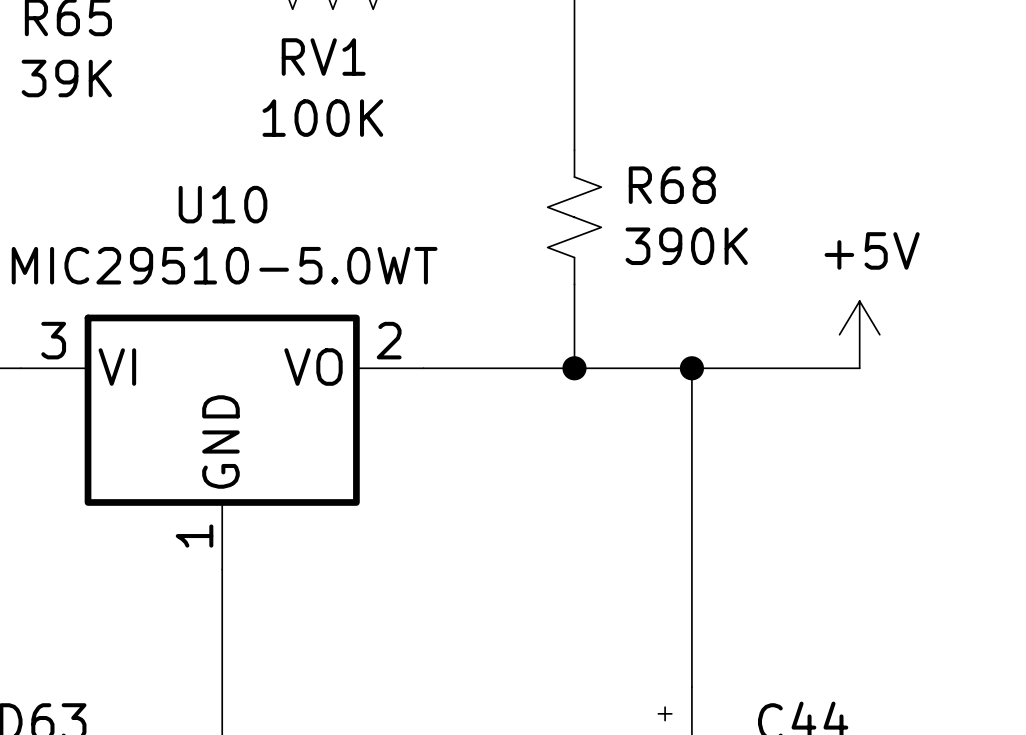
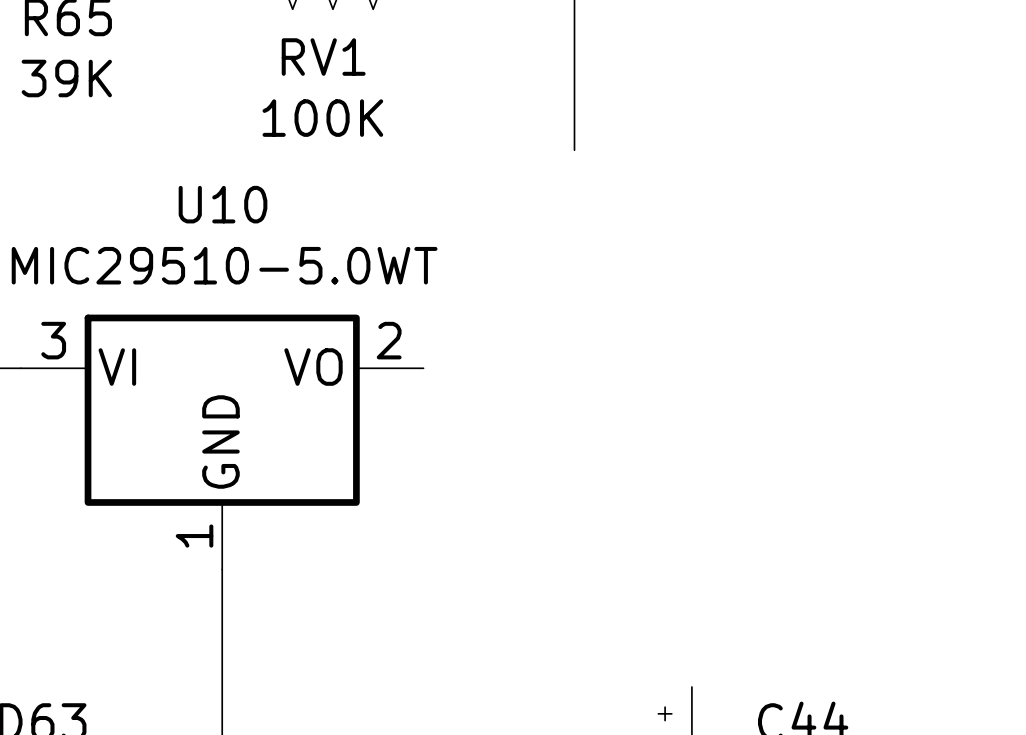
R68: 390K (574, 217) -> none
wire: (574, 284) (574, 368) -> none
power symbol: +5V (859, 334) -> none
wire: (423, 368) (859, 368) -> none
junction: (574, 368) -> none
wire: (691, 368) (691, 687) -> none
junction: (691, 368) -> none

